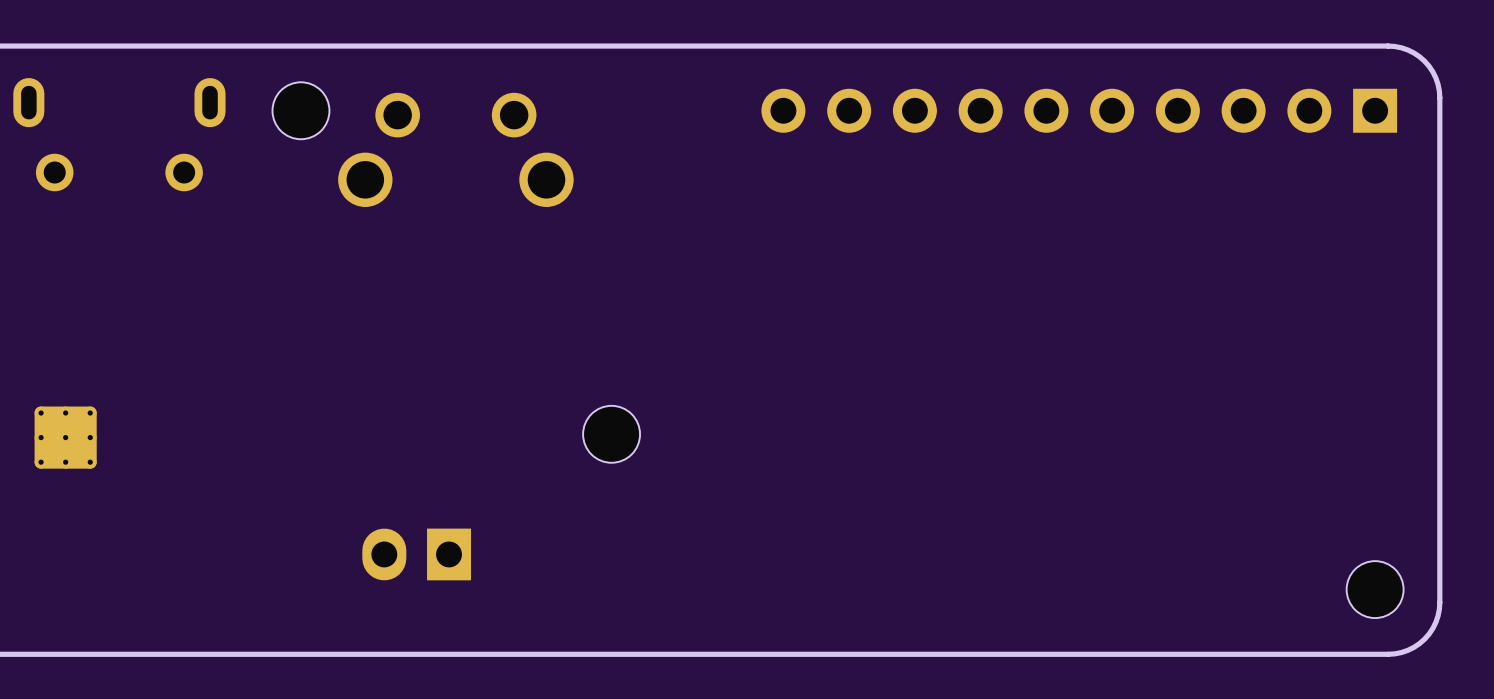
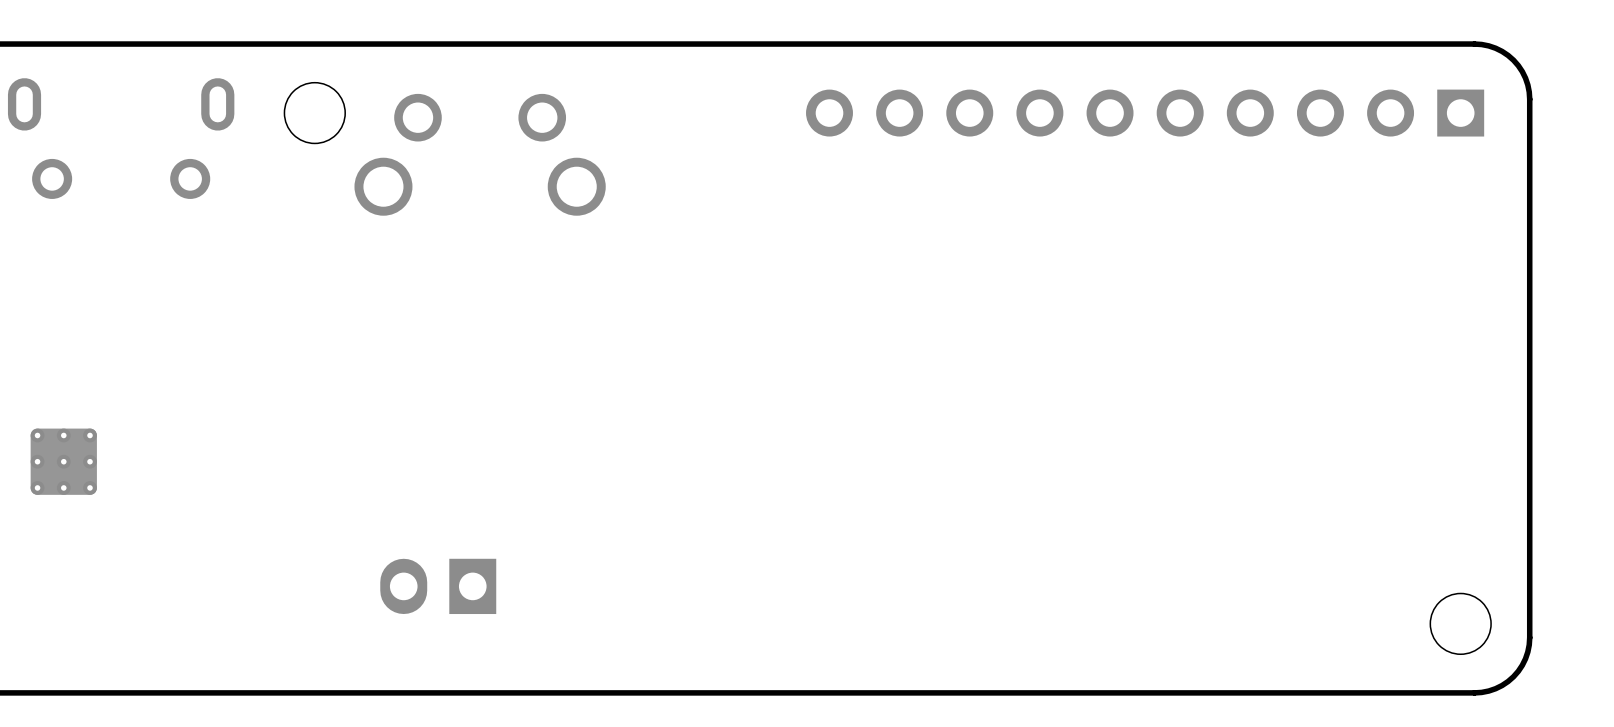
part: (611, 434) -> none

